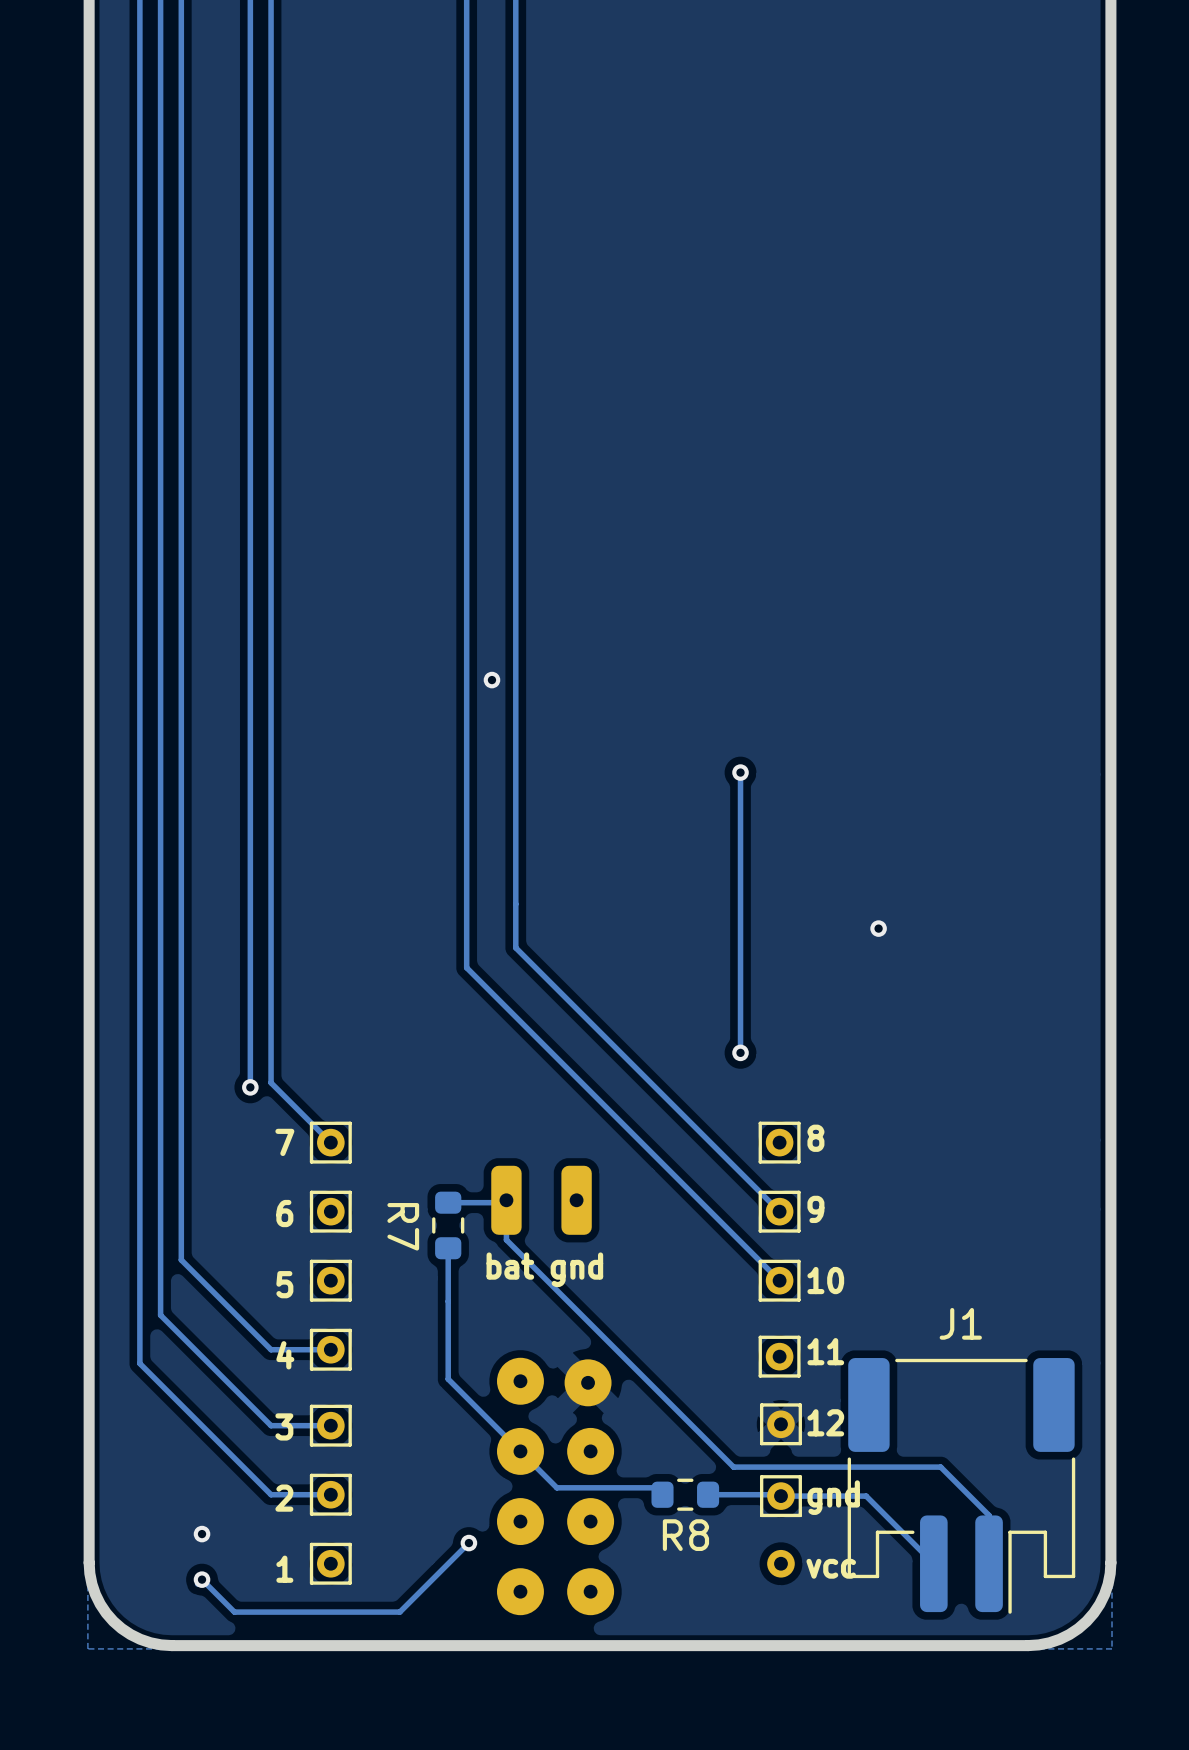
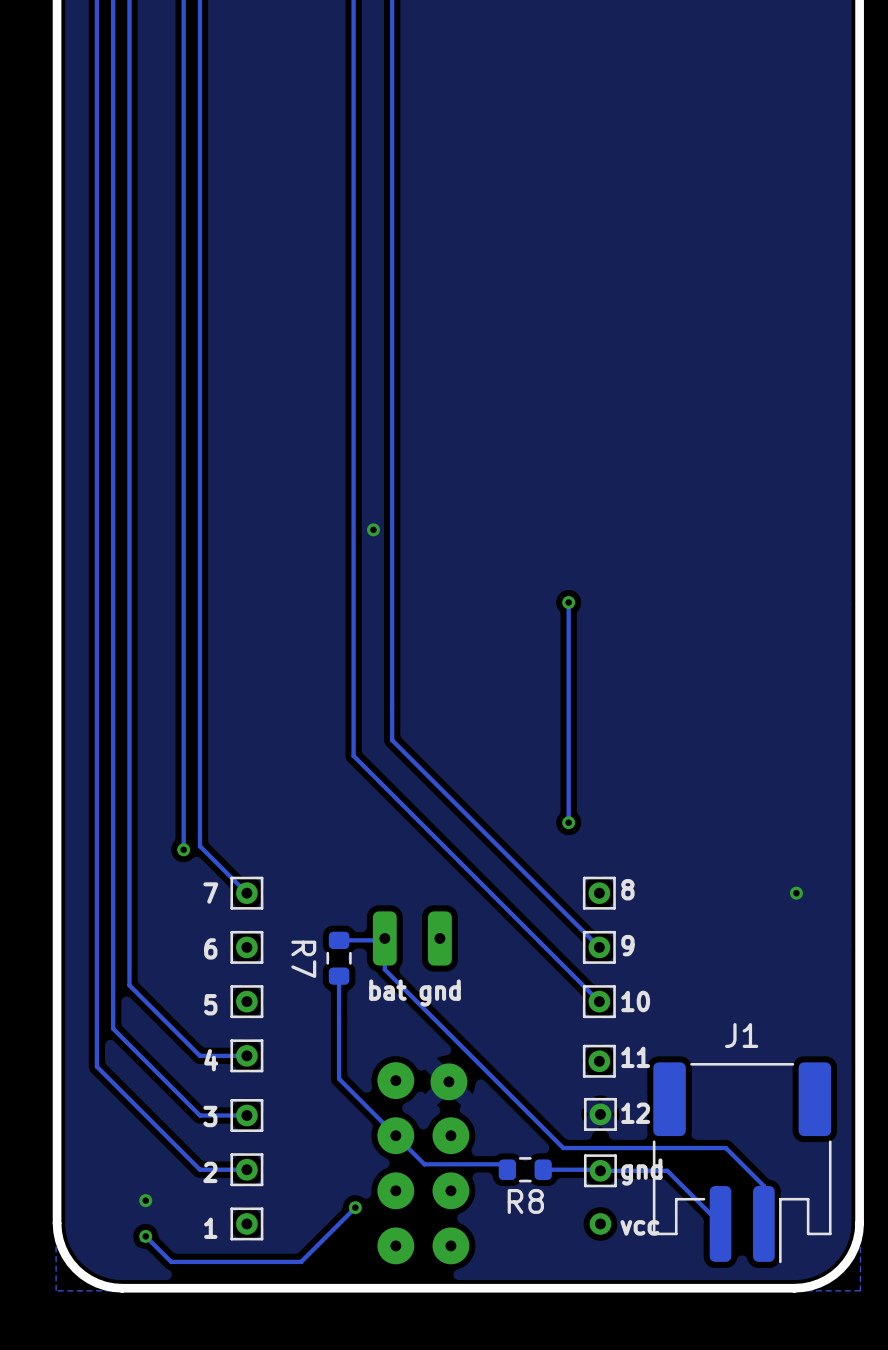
via: (878, 928) -> none
via: none -> (796, 893)

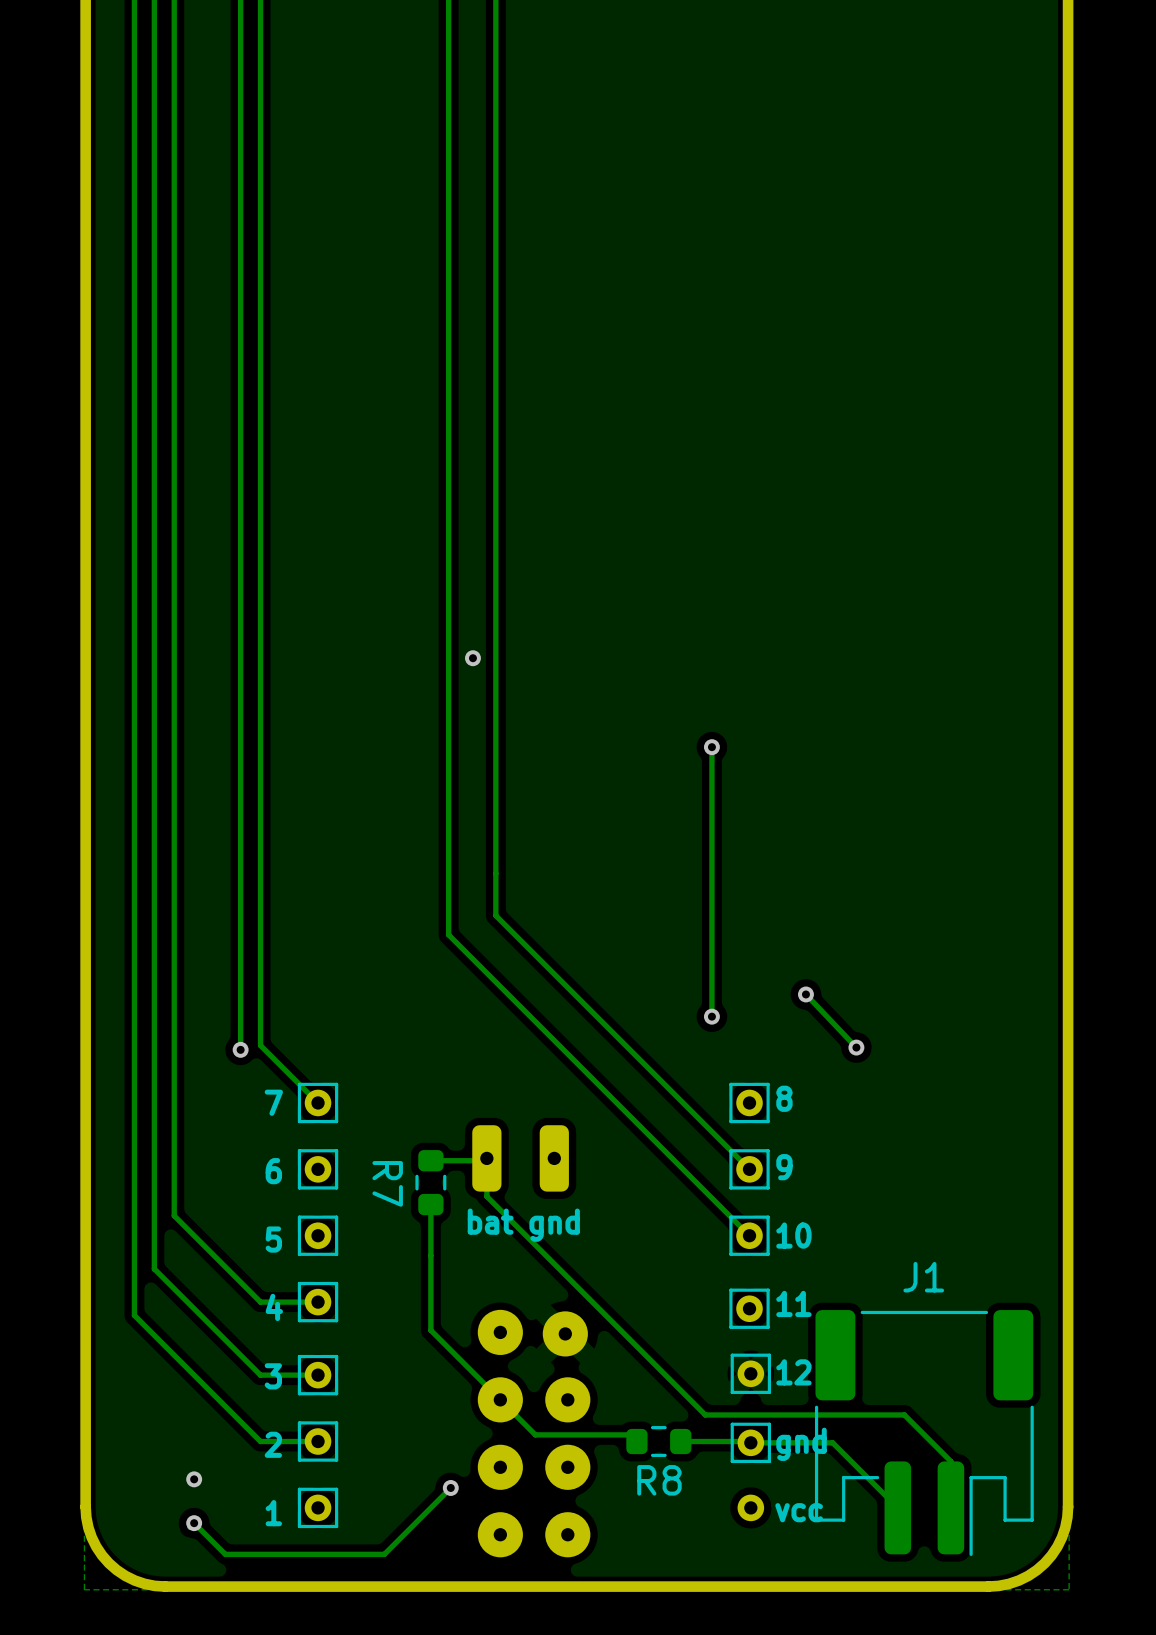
track: none -> (805, 994) (856, 1047)
via: none -> (805, 994)
via: none -> (856, 1047)
via: (796, 893) -> none

